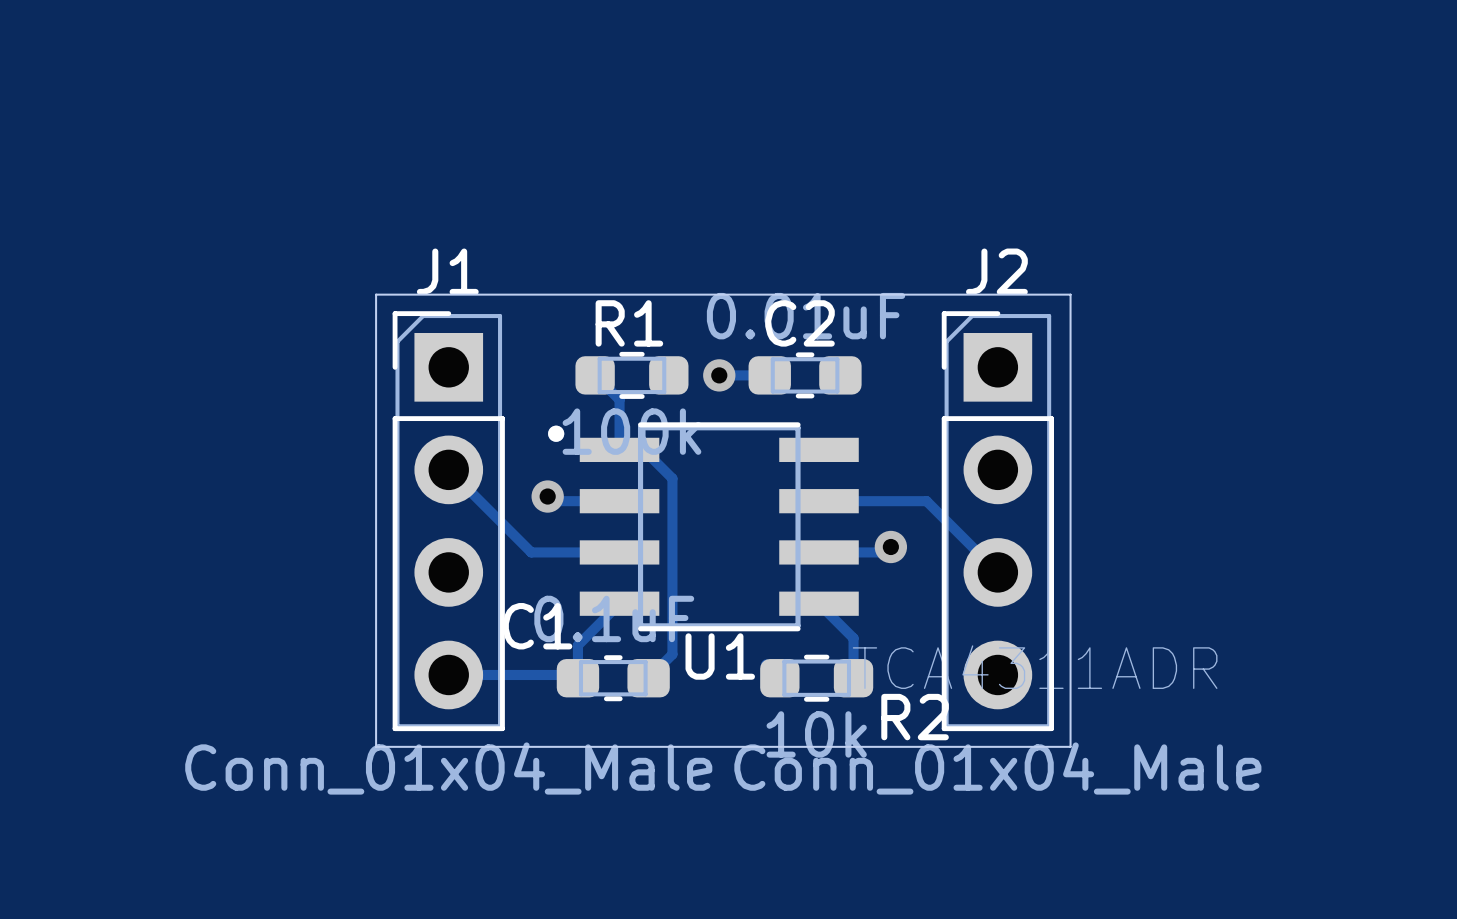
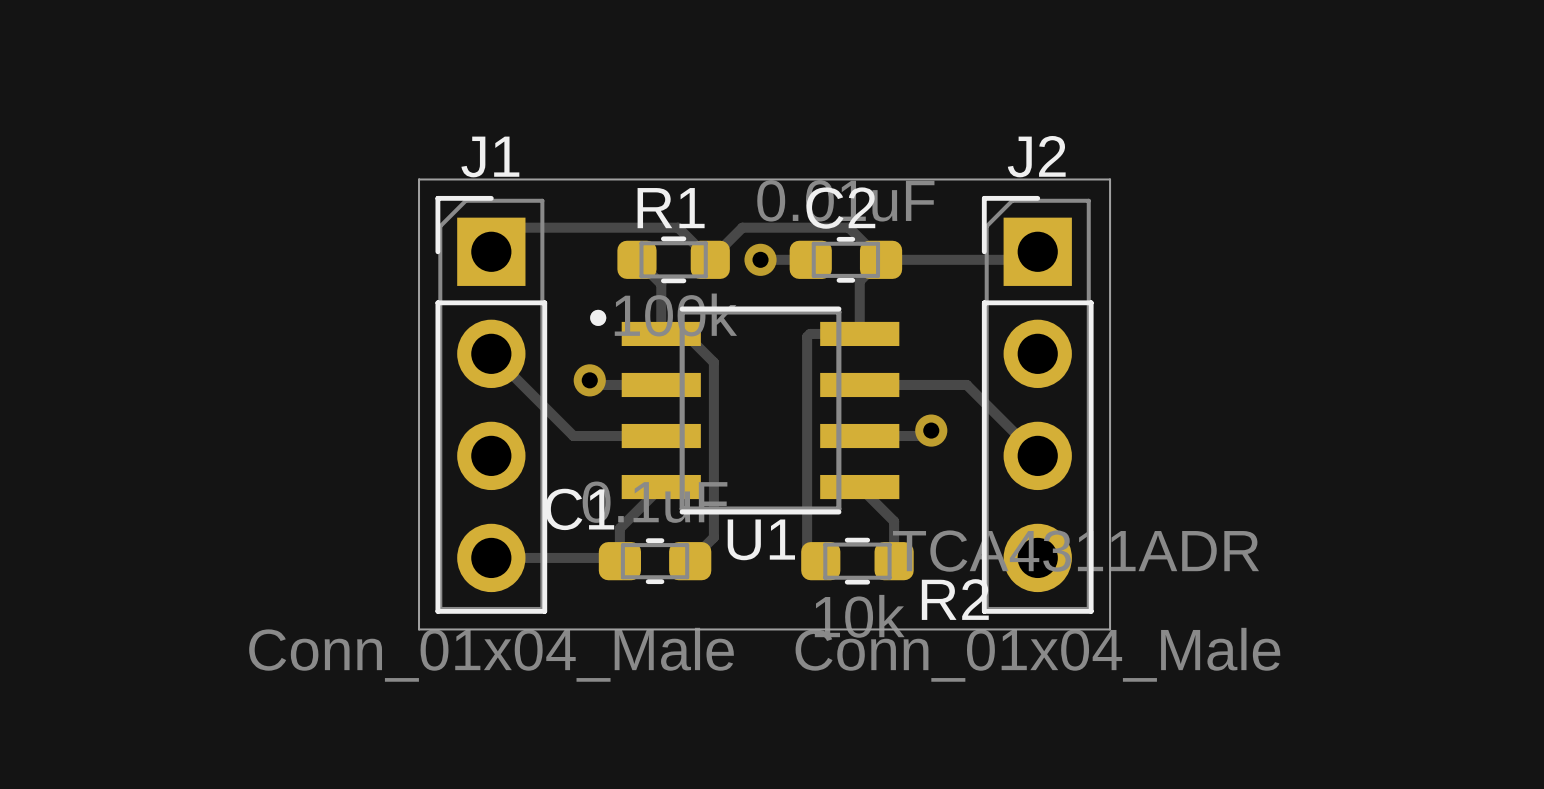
track: none -> (491, 251) (515, 227) (678, 227) (710, 259) (742, 227) (848, 227) (881, 259)
track: none -> (1037, 251) (1029, 259) (881, 259)
track: none -> (881, 259) (859, 281) (859, 333) (810, 333) (807, 336) (807, 547)

